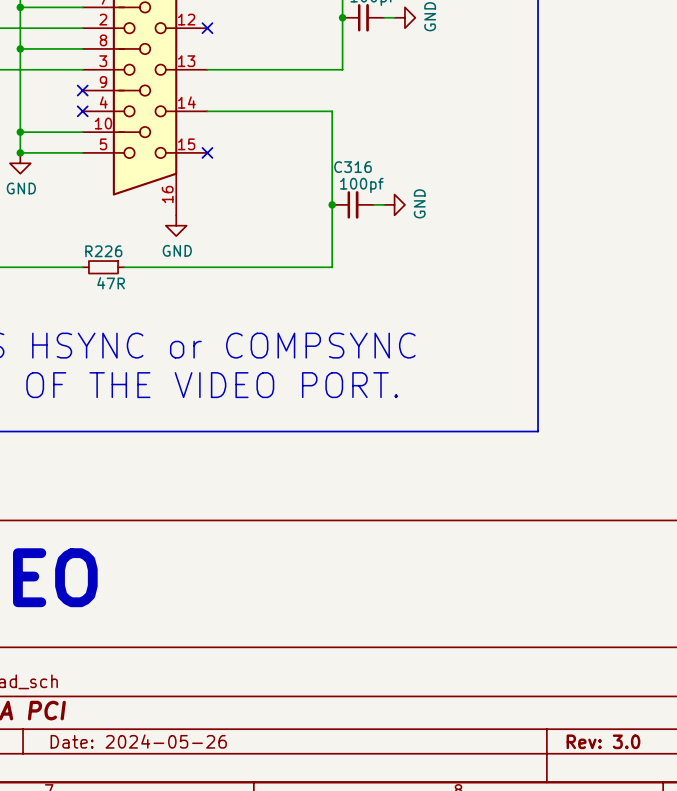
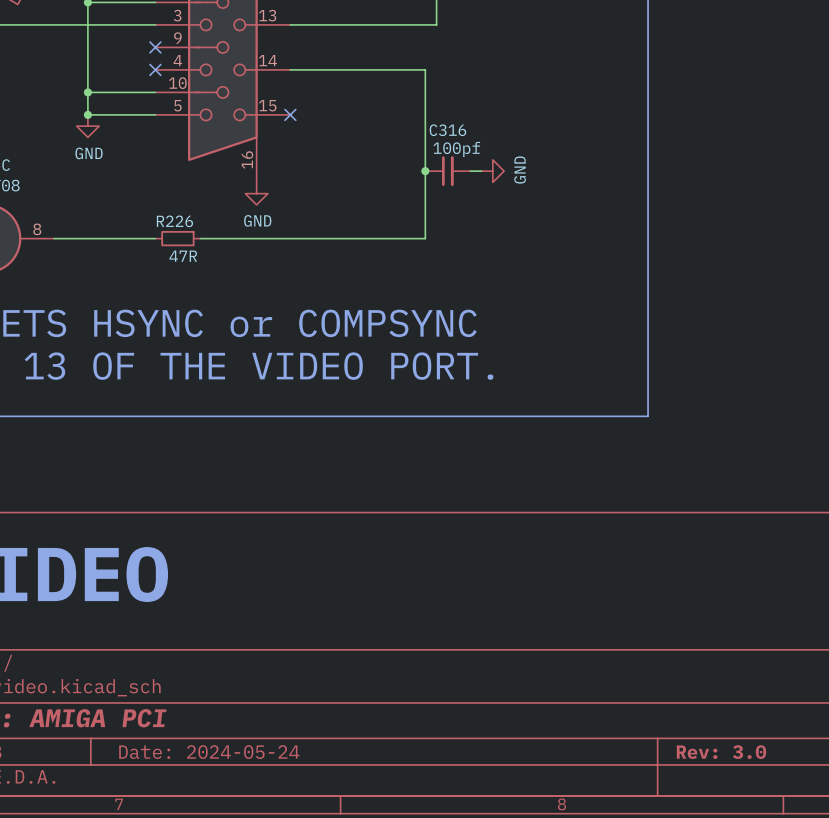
title block: Date: 2024-05-26 (138, 741) -> Date: 2024-05-24 (209, 752)

